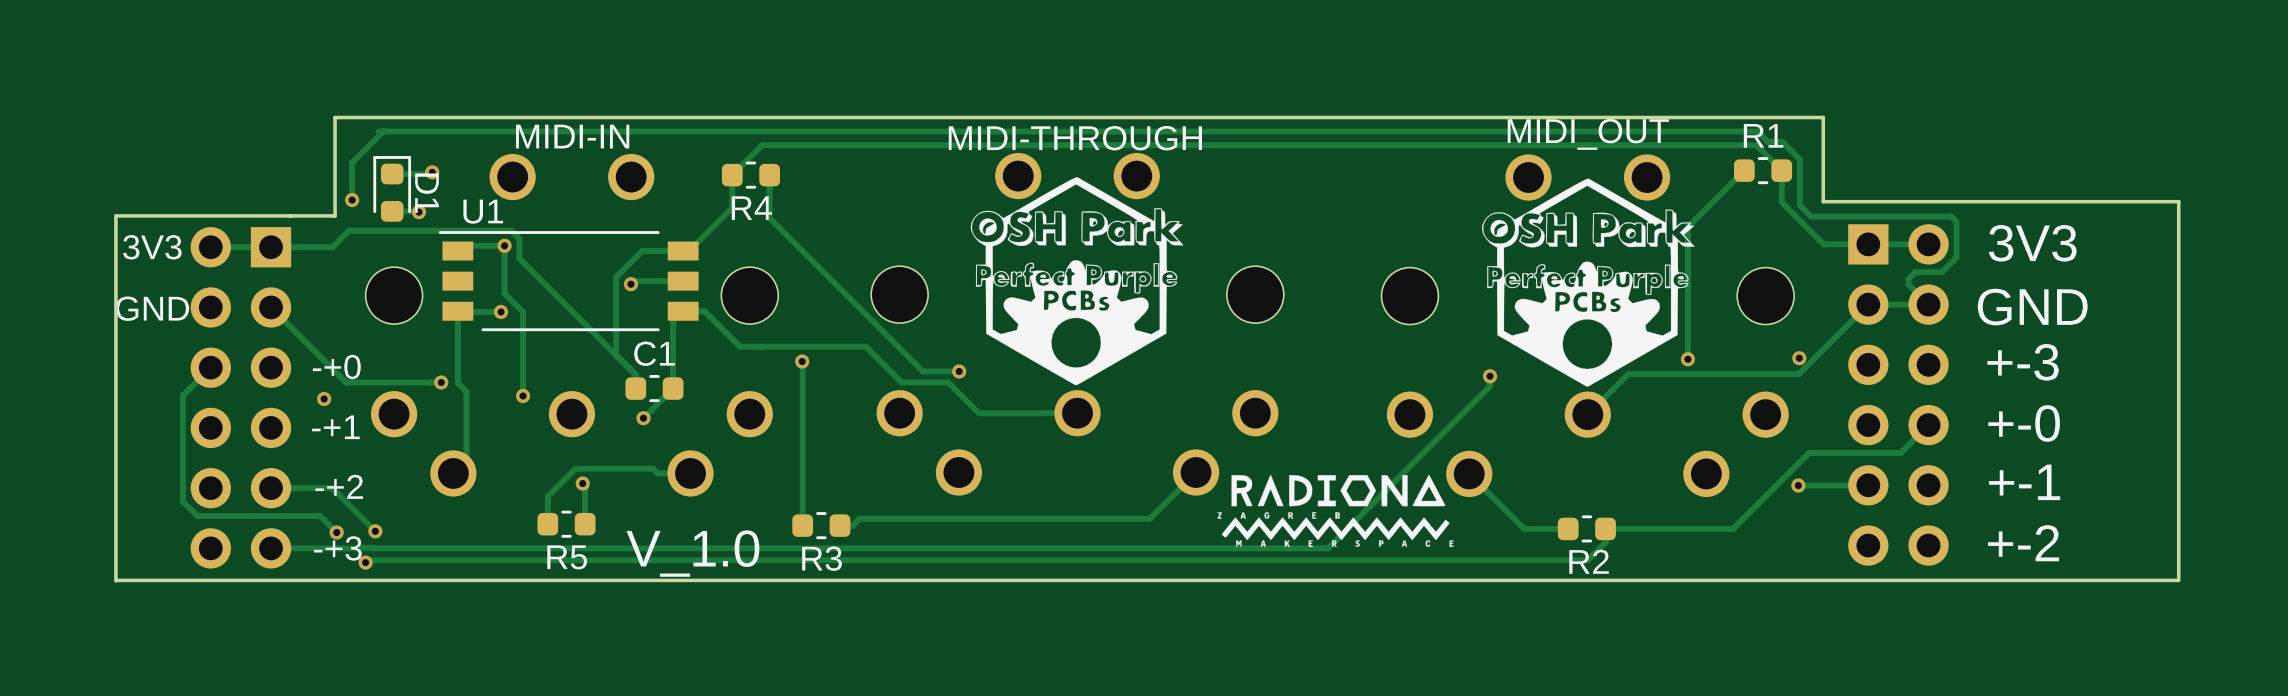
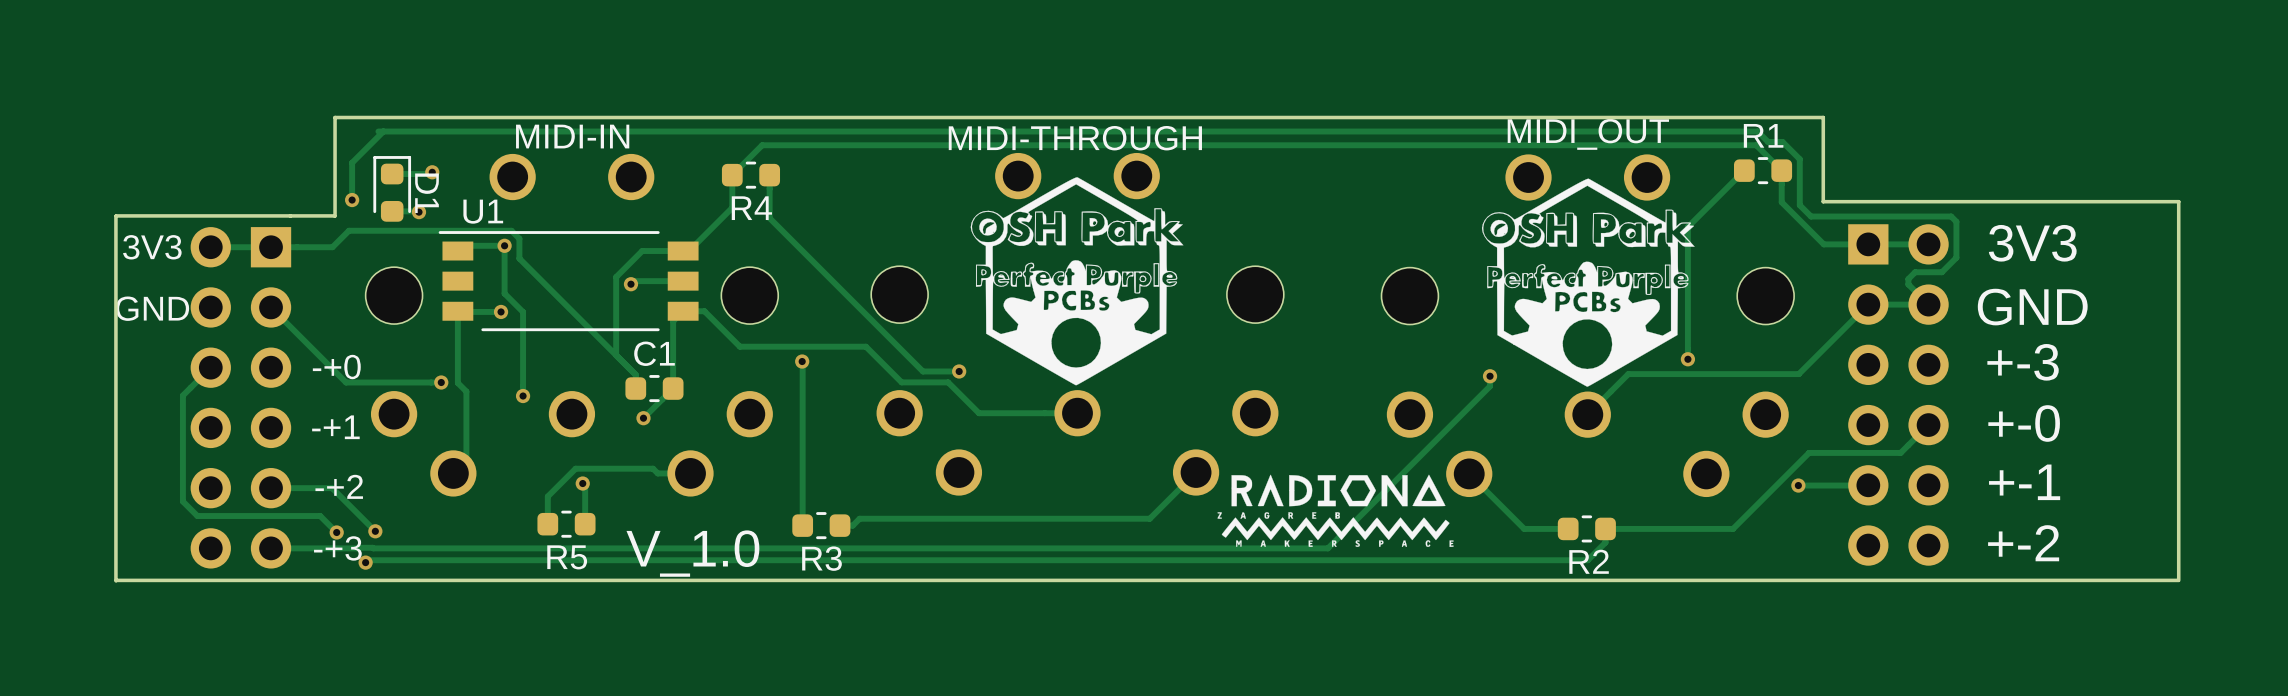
via: (1799, 358) -> none
via: (324, 398) -> none

